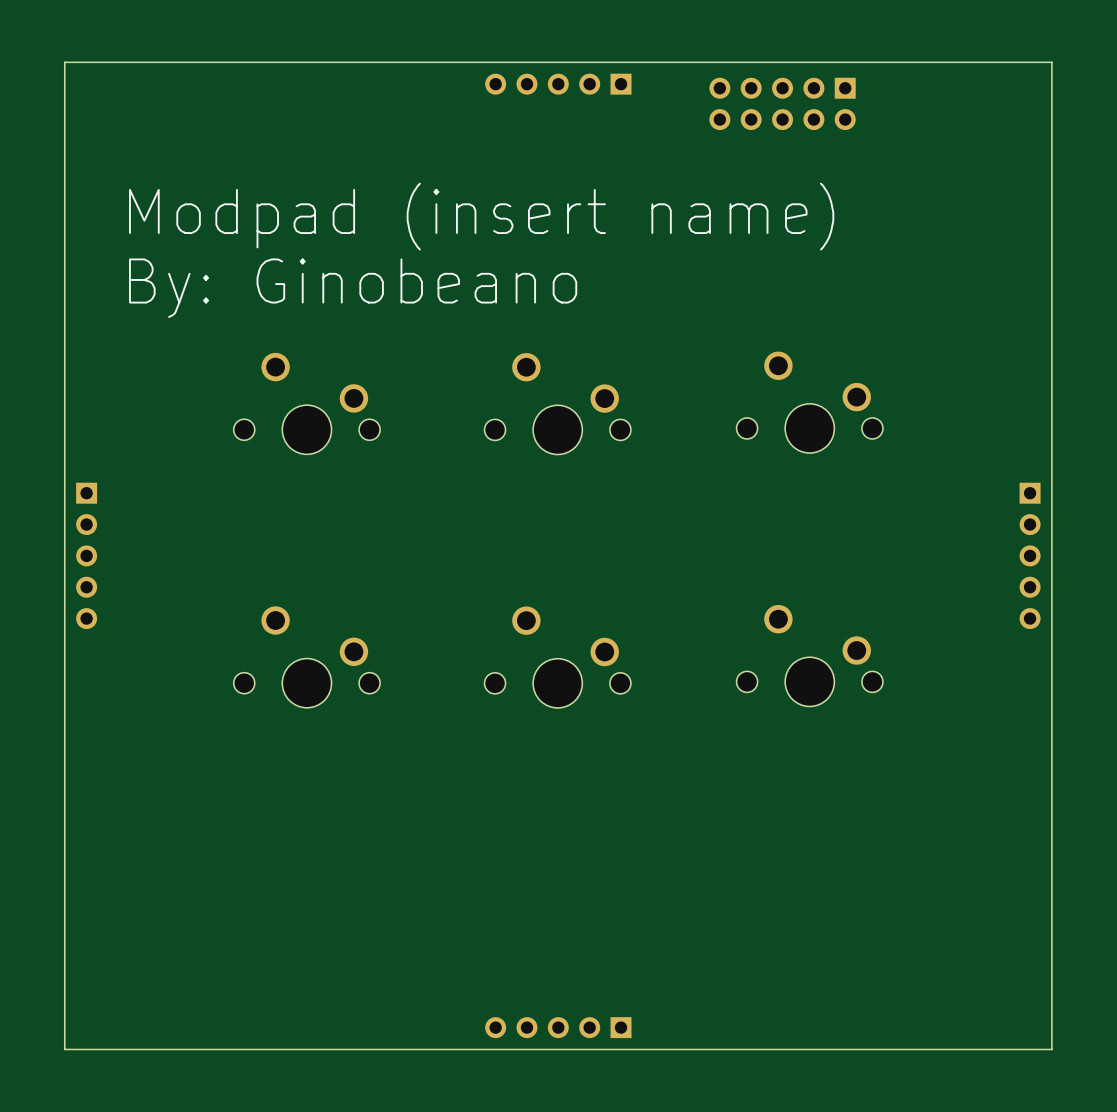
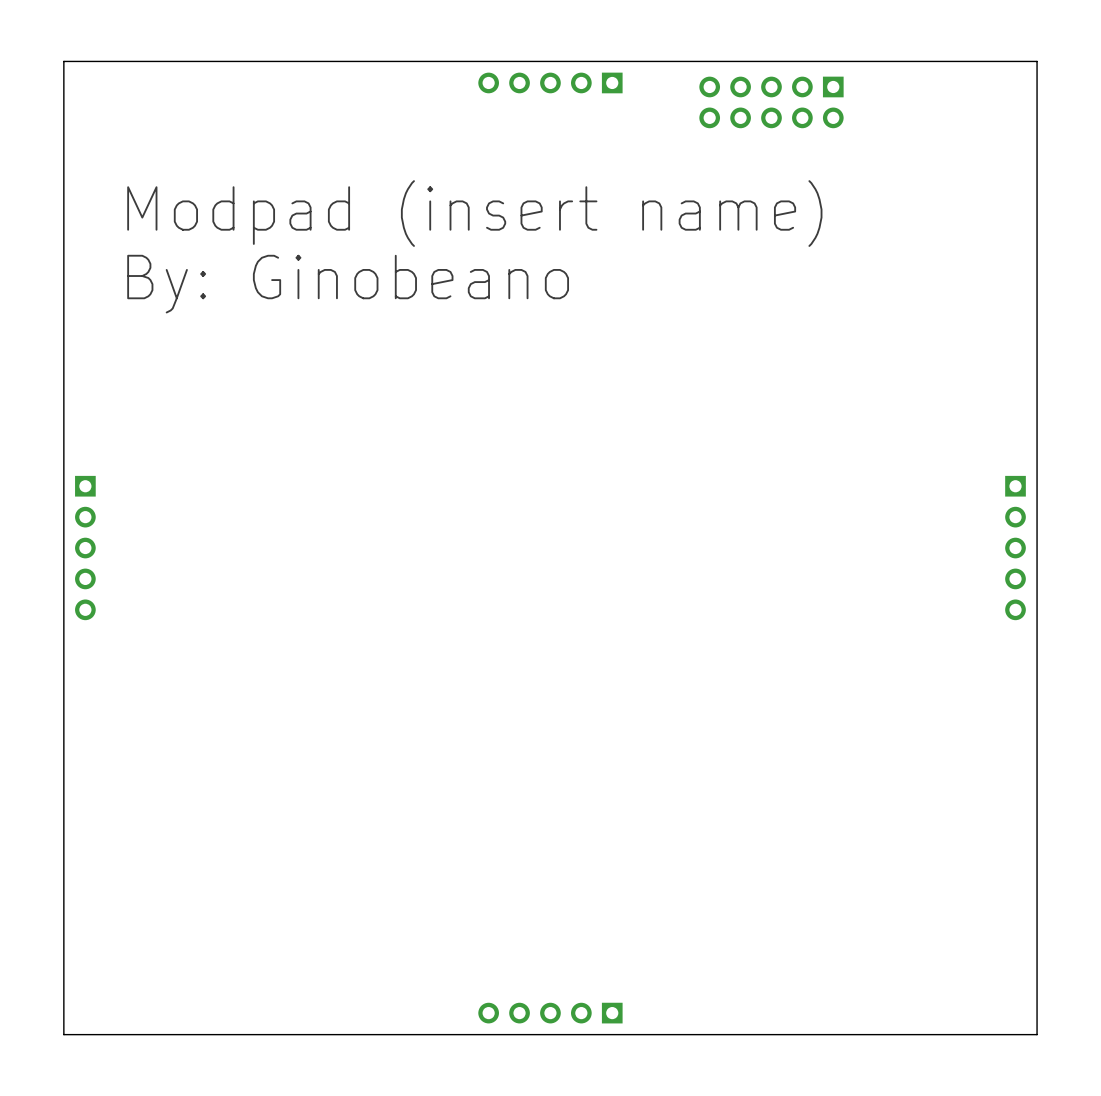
part: (809, 402) -> none
part: (306, 403) -> none
part: (557, 403) -> none
part: (809, 655) -> none
part: (306, 657) -> none
part: (557, 657) -> none

